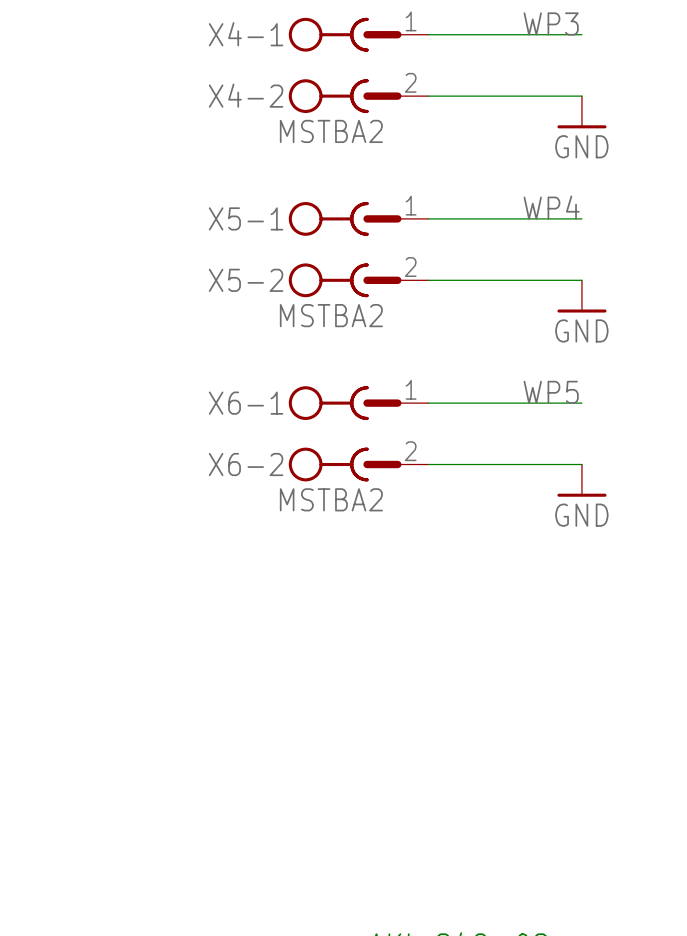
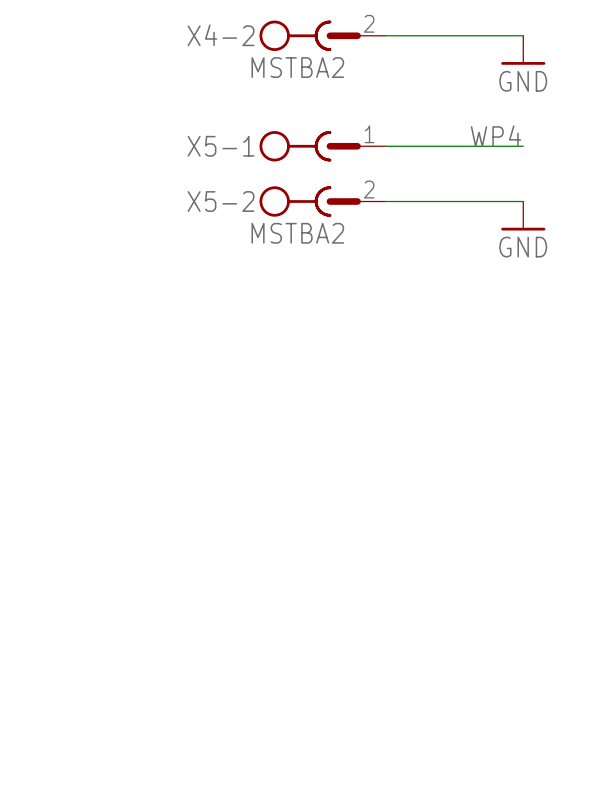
label: WP5 (551, 392) -> none
X6-1: (358, 403) -> none
wire: (428, 403) (581, 403) -> none
X6-2: MSTBA2 (358, 464) -> none
wire: (428, 464) (581, 464) -> none
power symbol: GND (581, 480) -> none

